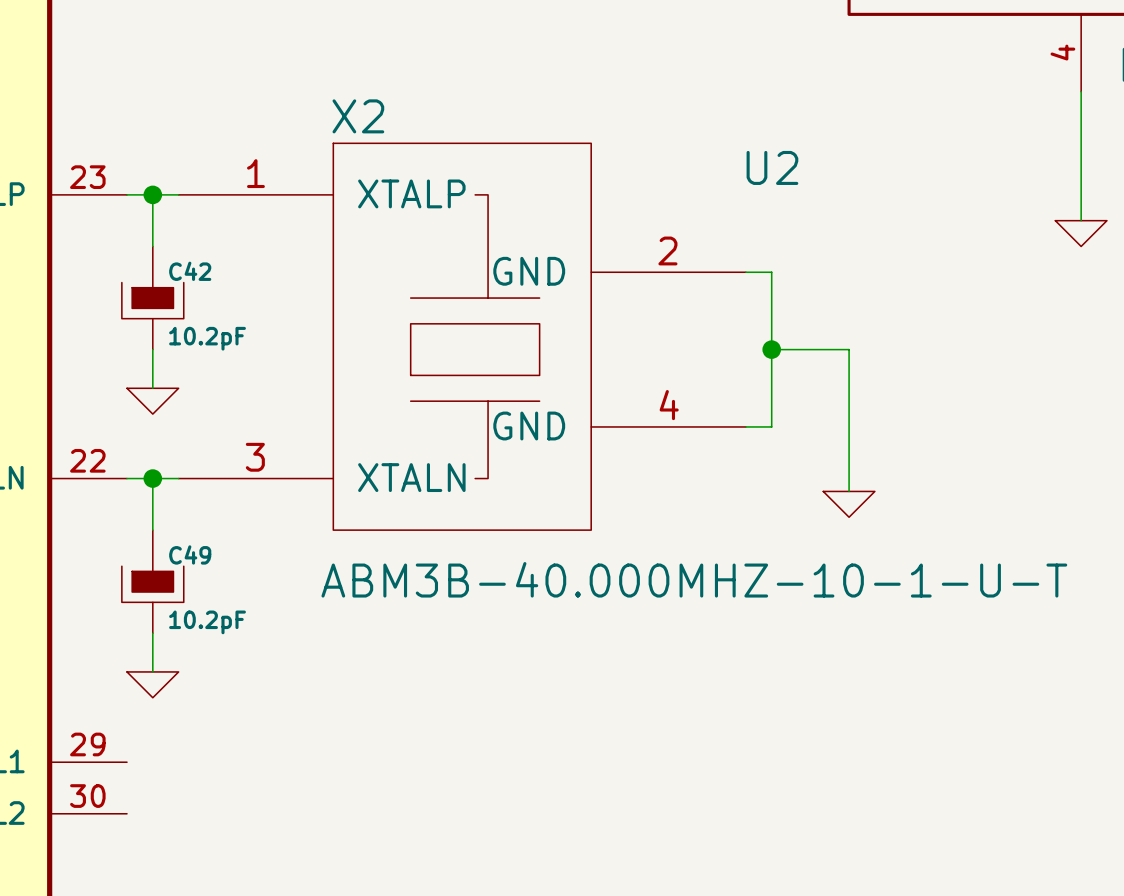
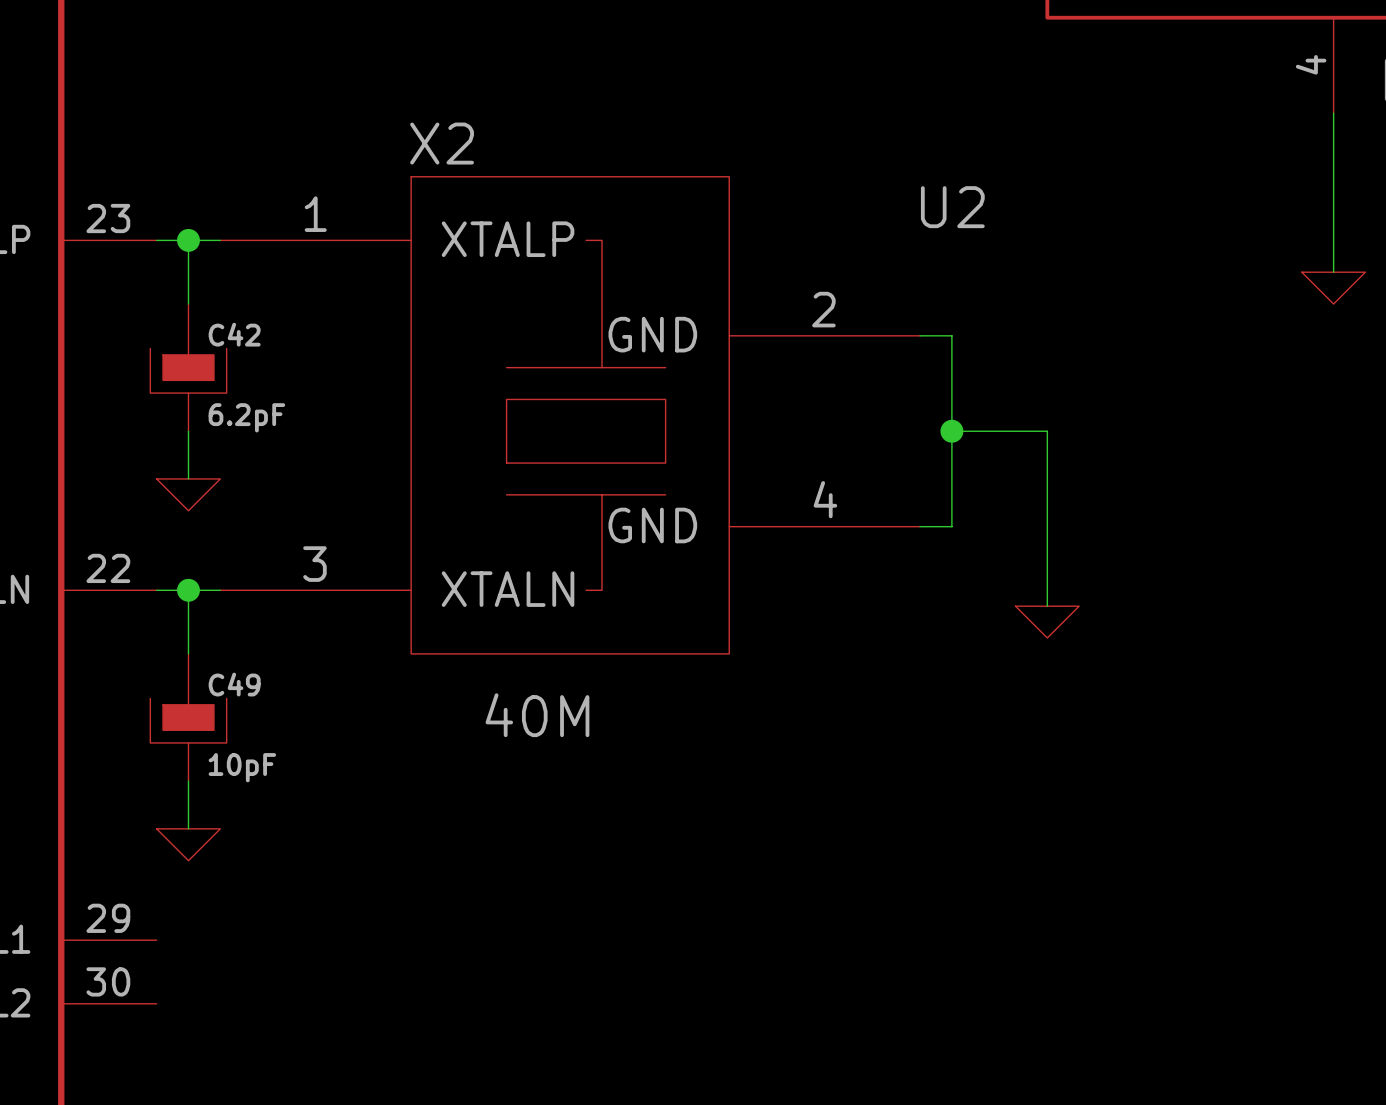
C42 value: 10.2pF (207, 338) -> 6.2pF (246, 417)
X2 value: ABM3B-40.000MHZ-10-1-U-T (694, 579) -> 40M (537, 715)
C49 value: 10.2pF (207, 622) -> 10pF (242, 767)

